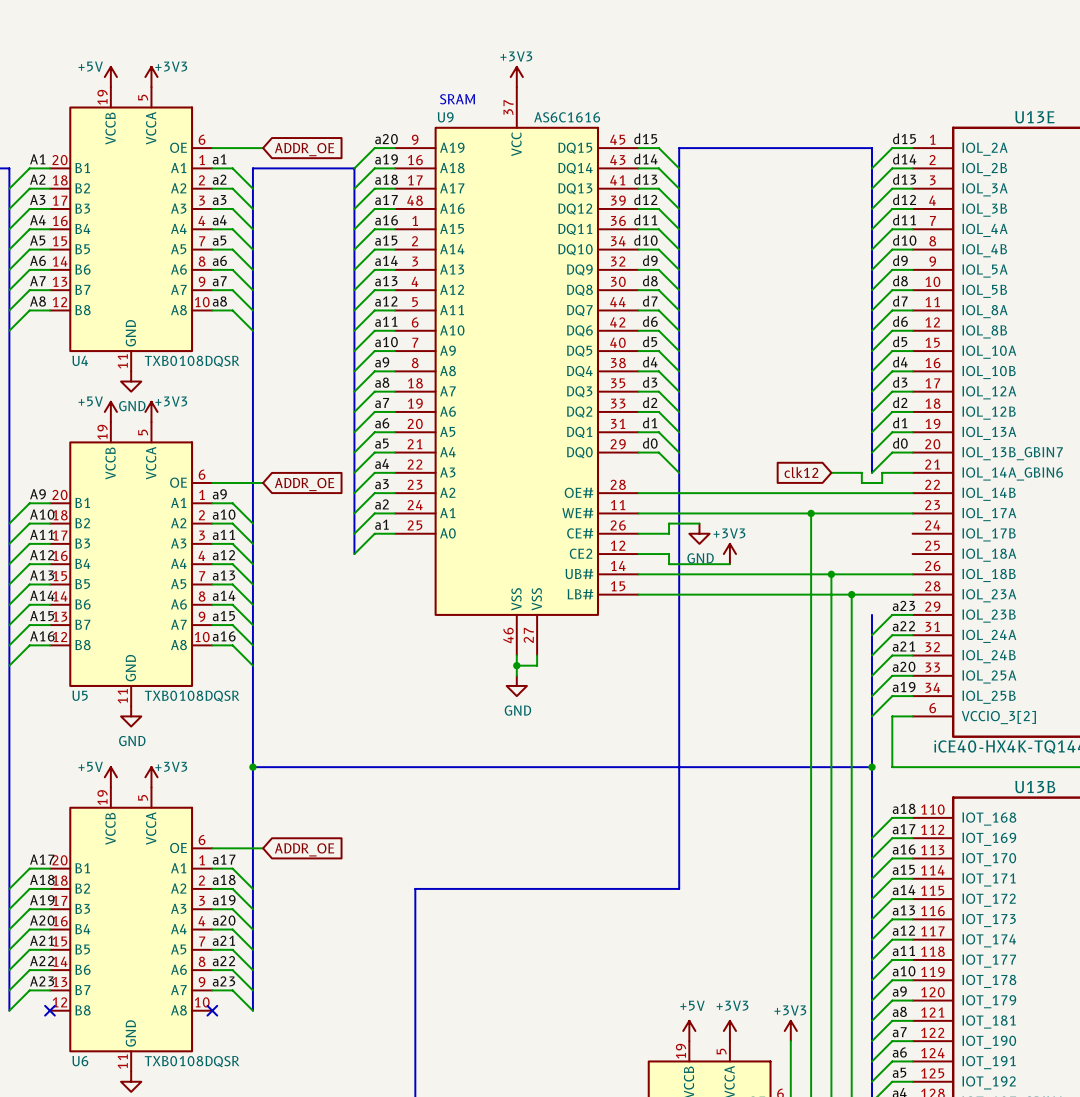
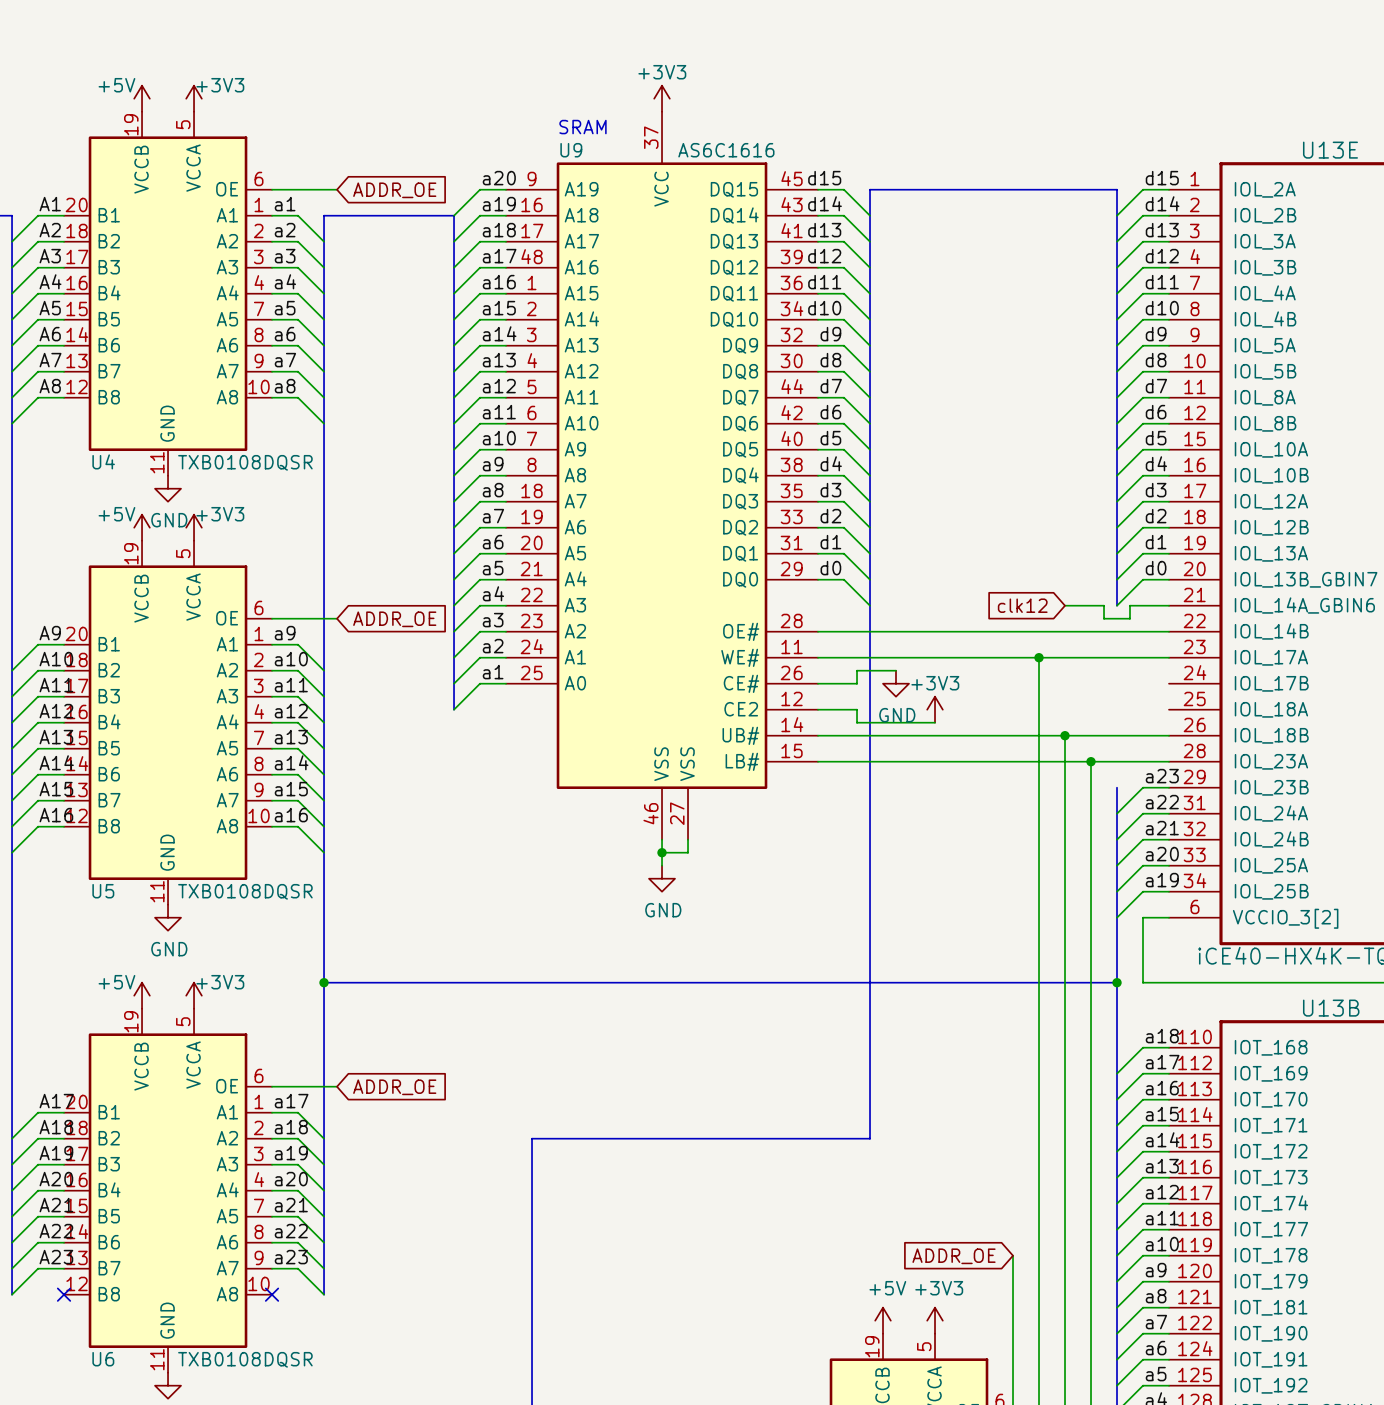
wire: none -> (1013, 1255) (1013, 1333)
global label: none -> ADDR_OE (954, 1256)
power symbol: +3V3 (790, 1031) -> none

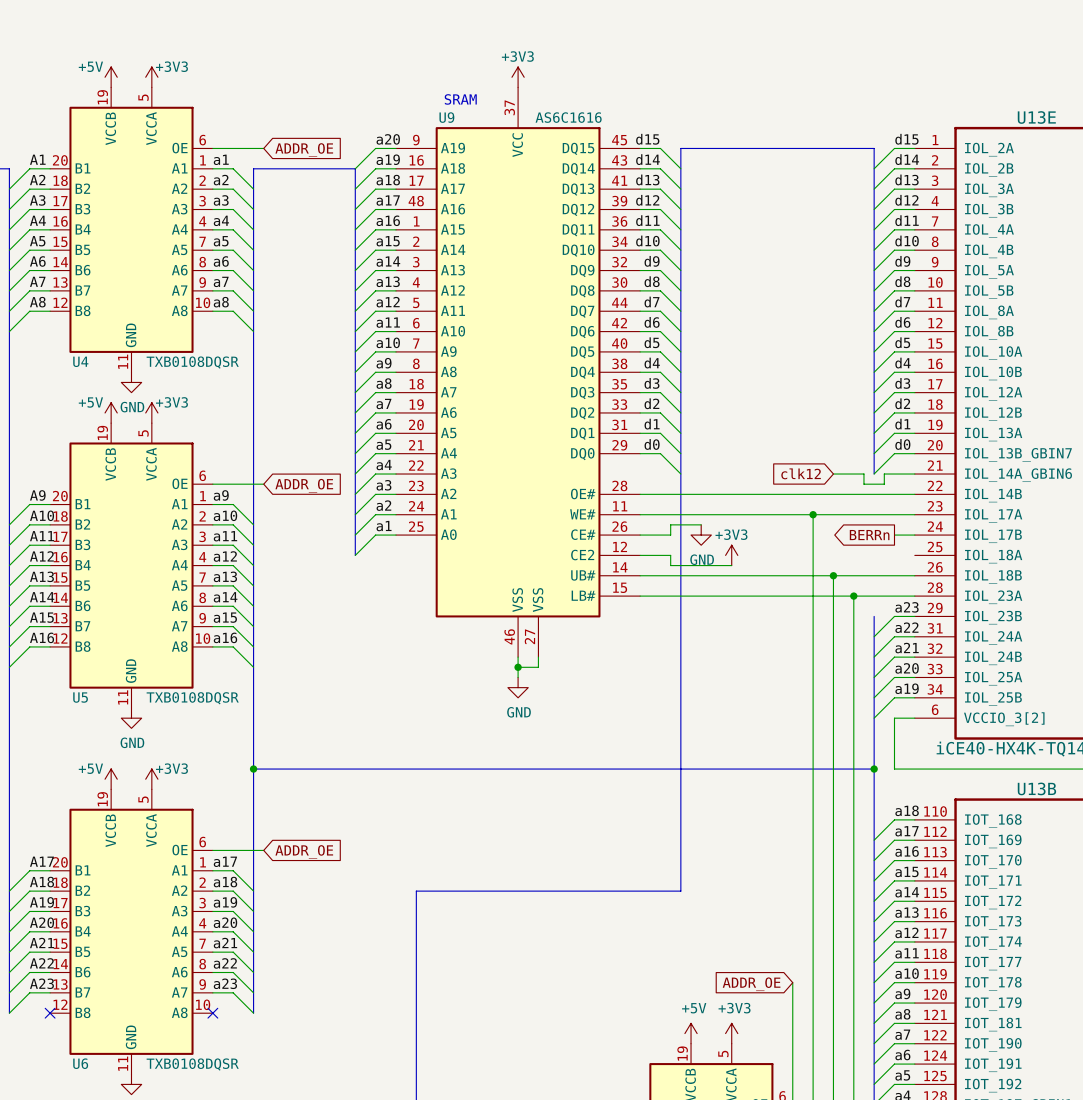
global label: none -> BERRn (869, 535)
wire: none -> (894, 535) (914, 535)

